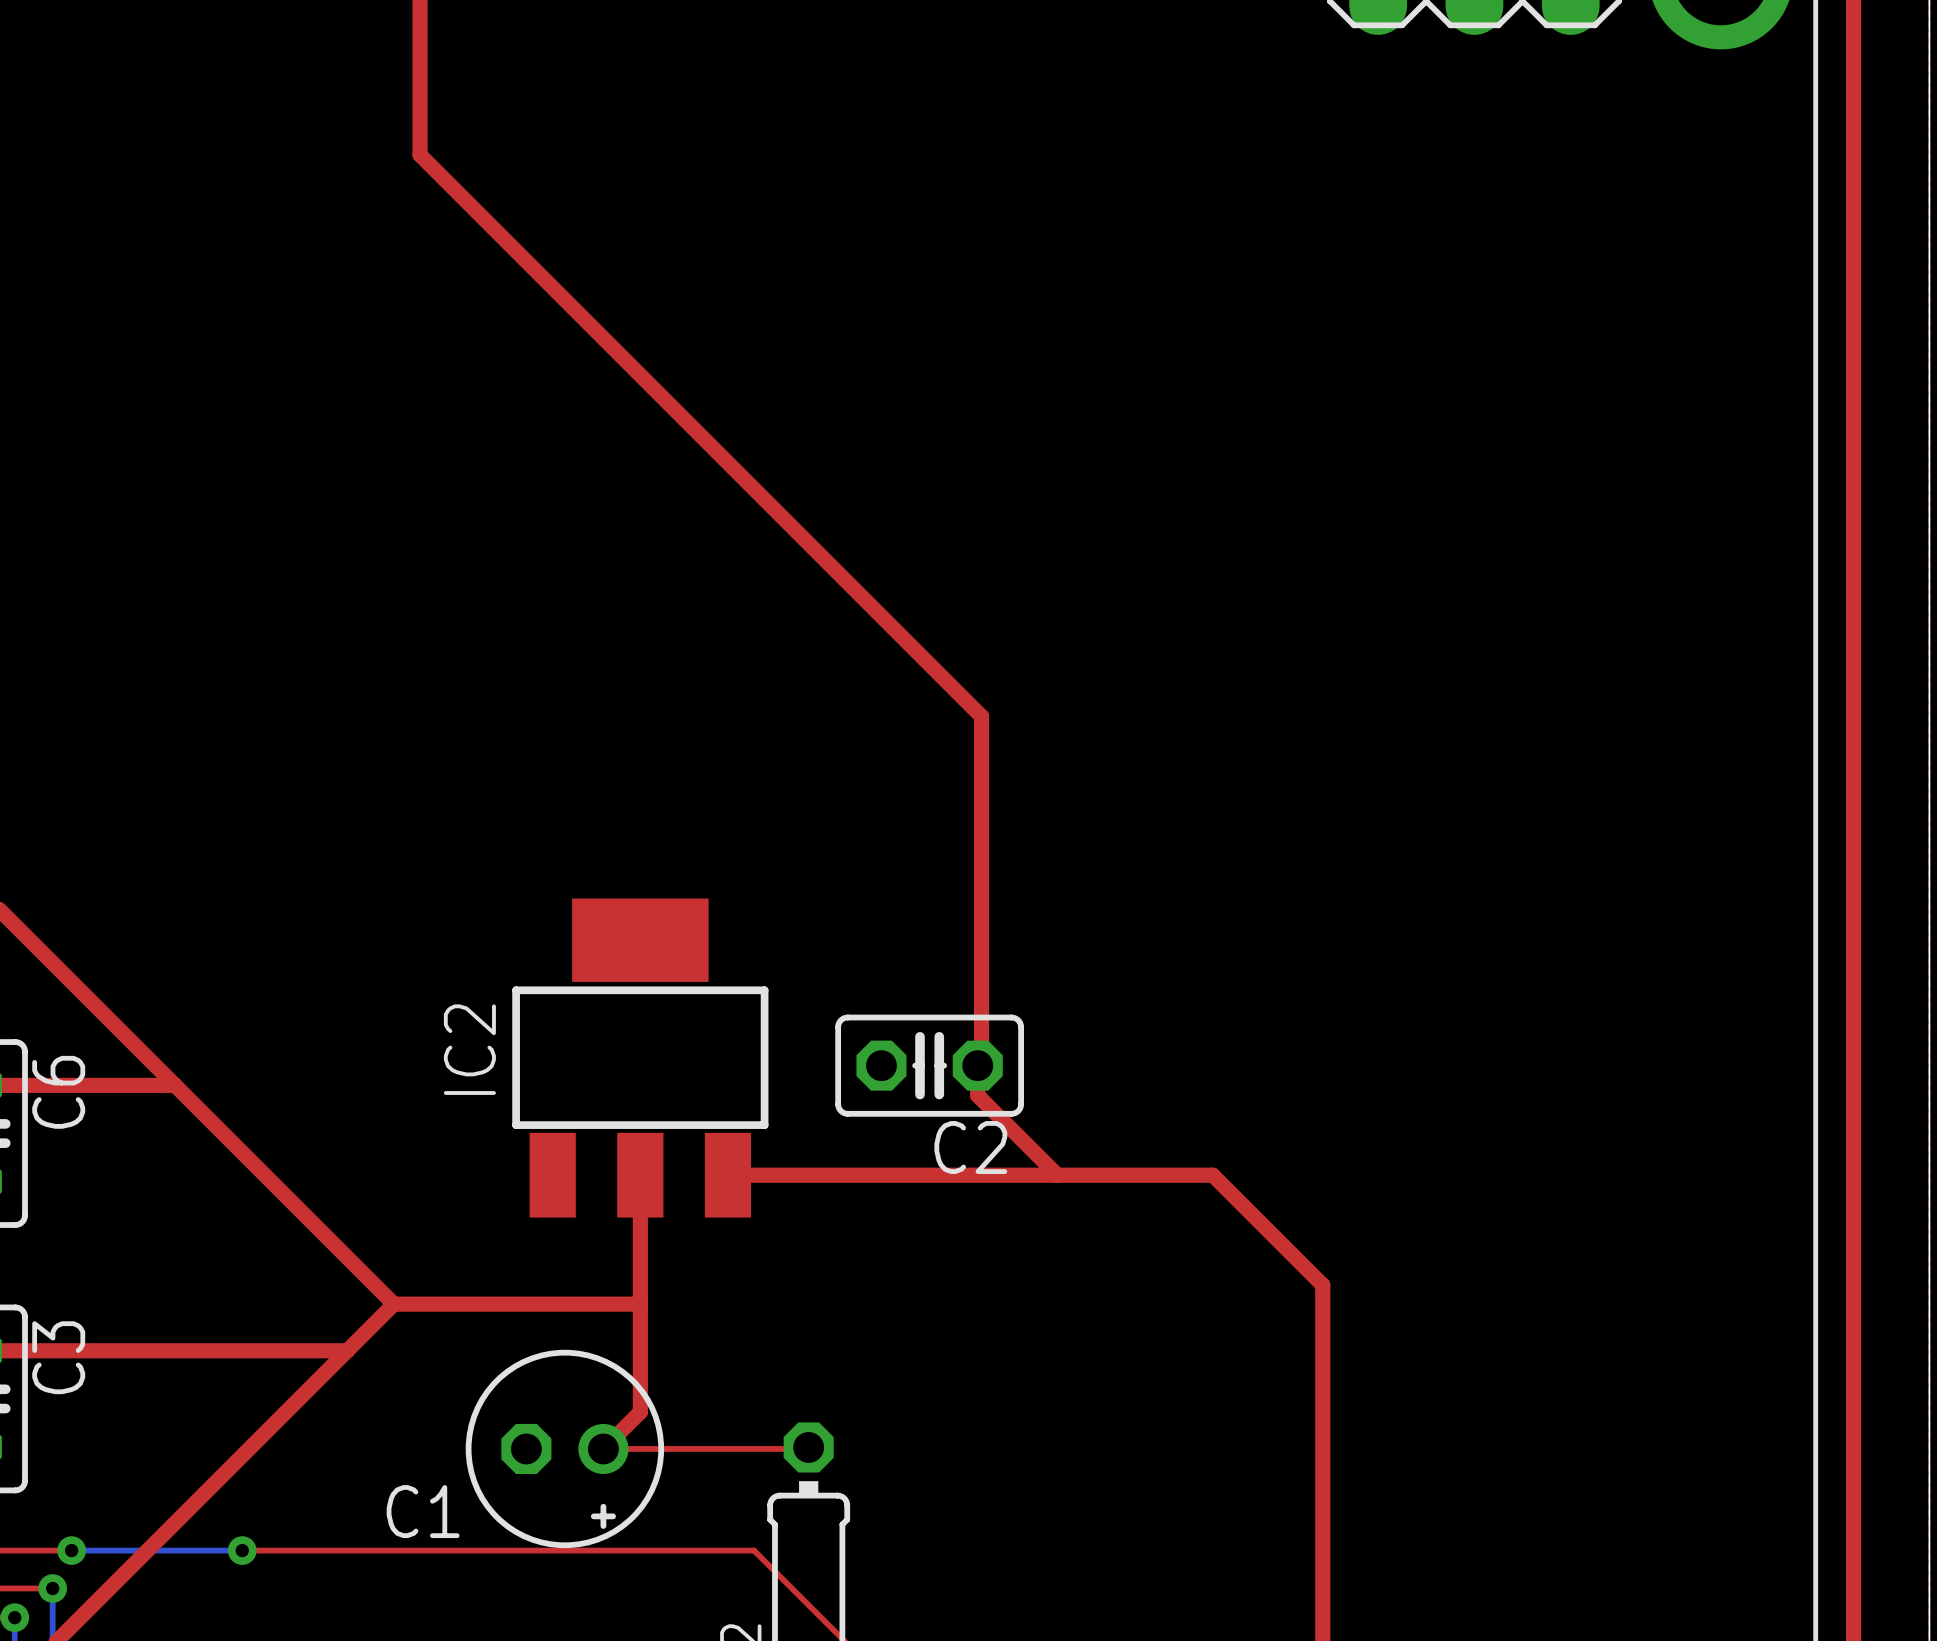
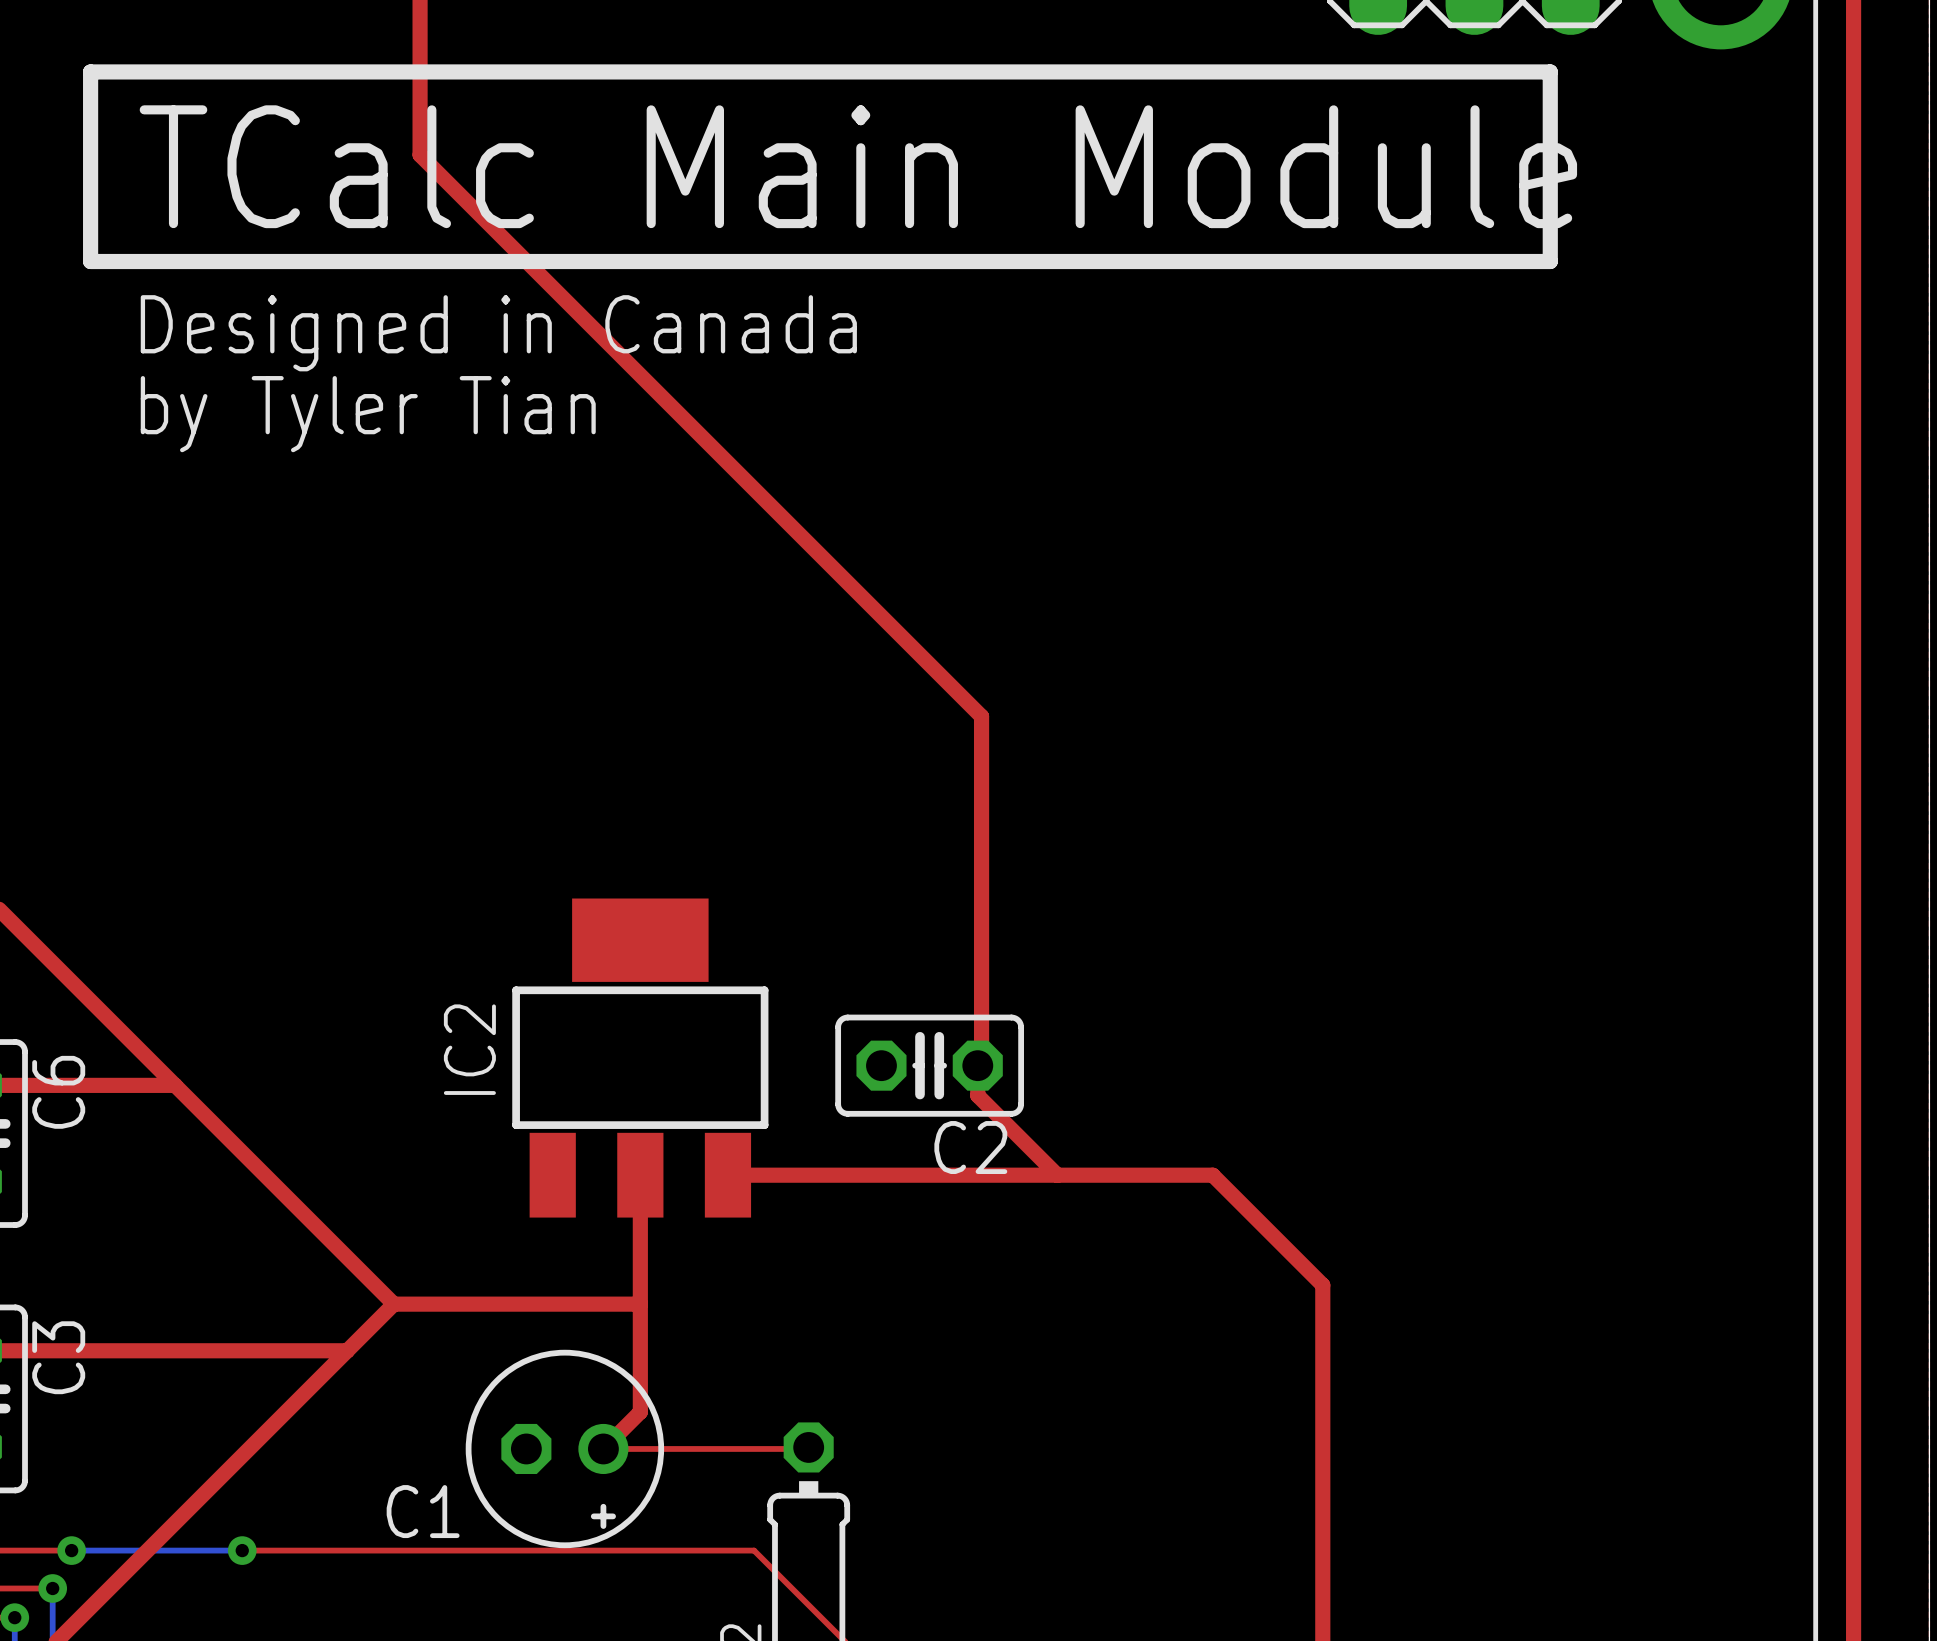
line: none -> (90, 71) (90, 261) (1550, 261) (1550, 71) (90, 71)
text: none -> TCalc Main Module (858, 166)
text: none -> Designed in Canada (498, 333)
text: none -> by Tyler Tian (368, 414)

